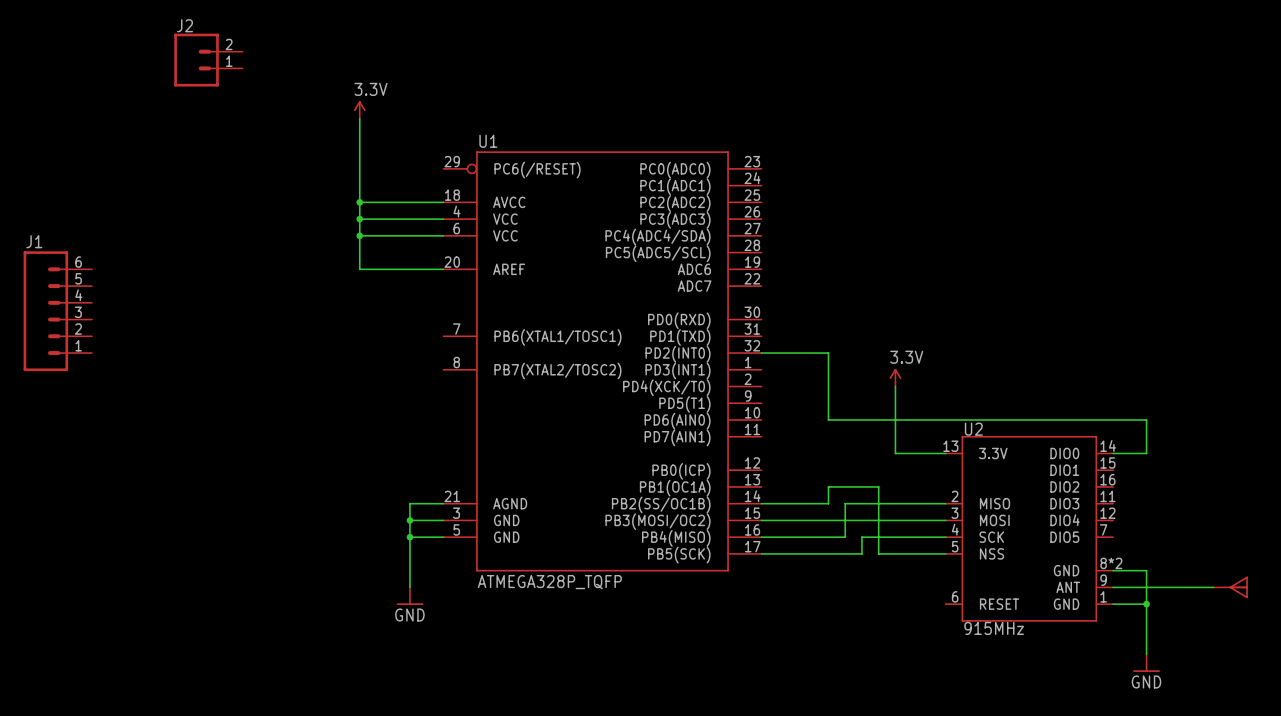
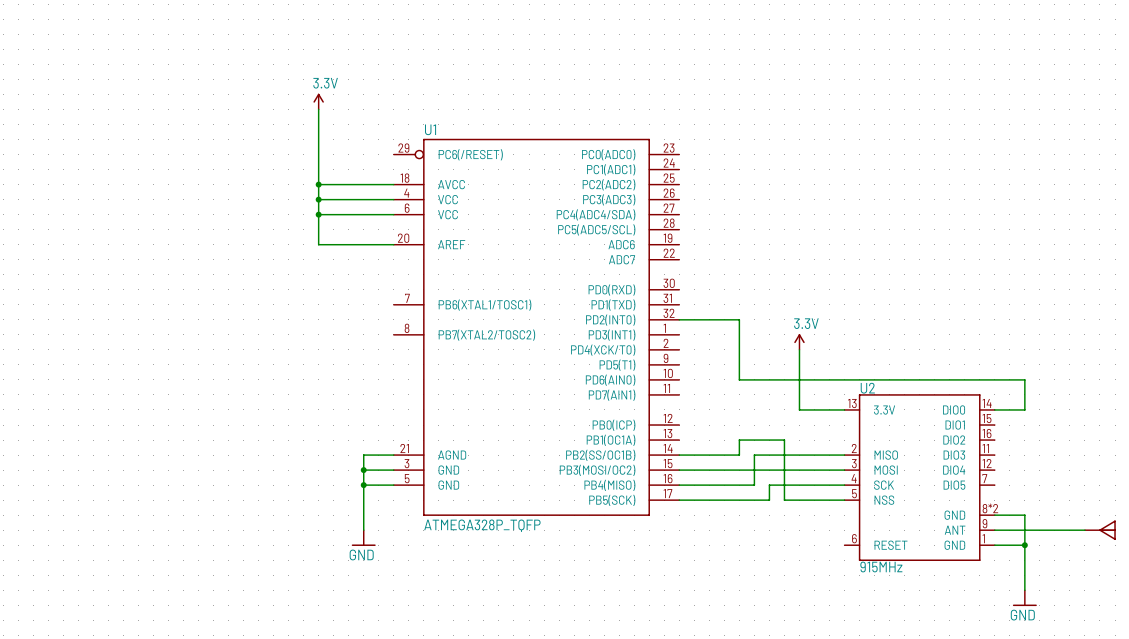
J2: (208, 60) -> none
J1: (57, 311) -> none

